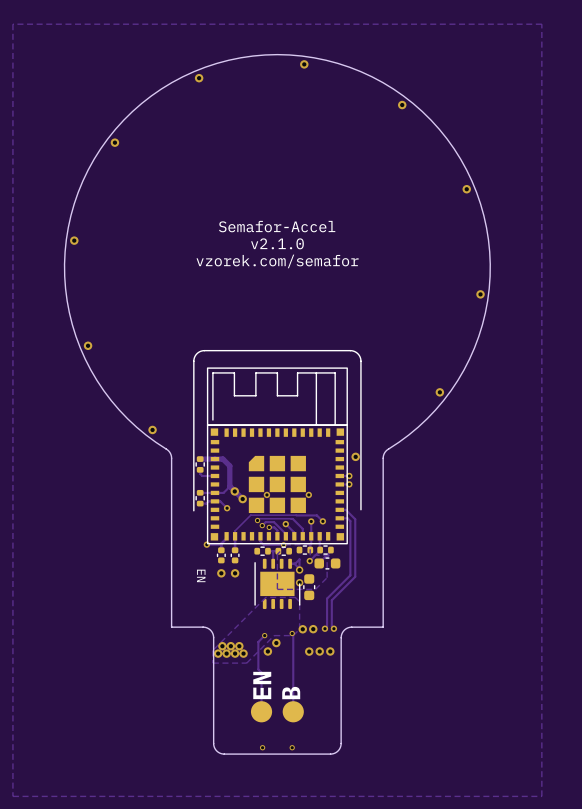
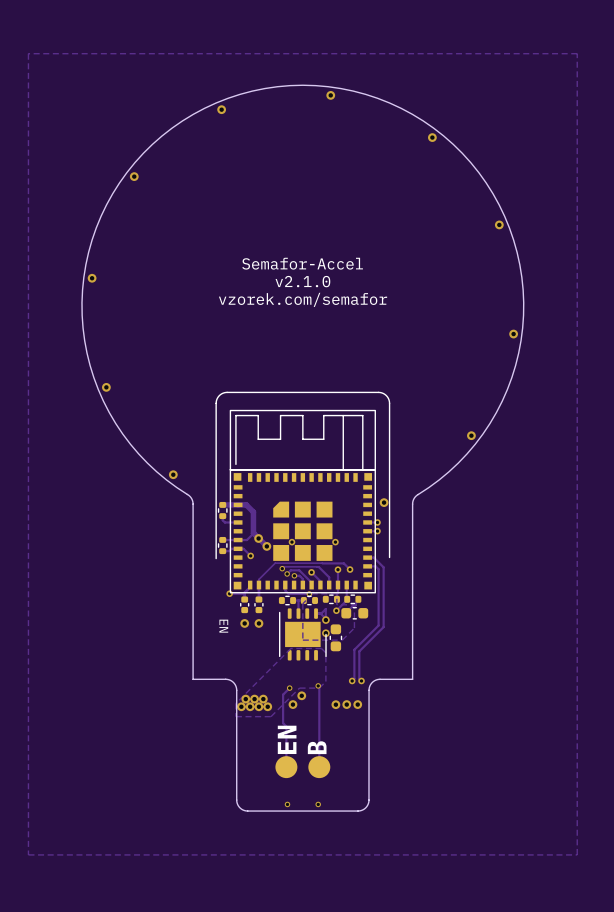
via: (302, 629) -> none
via: (313, 629) -> none

